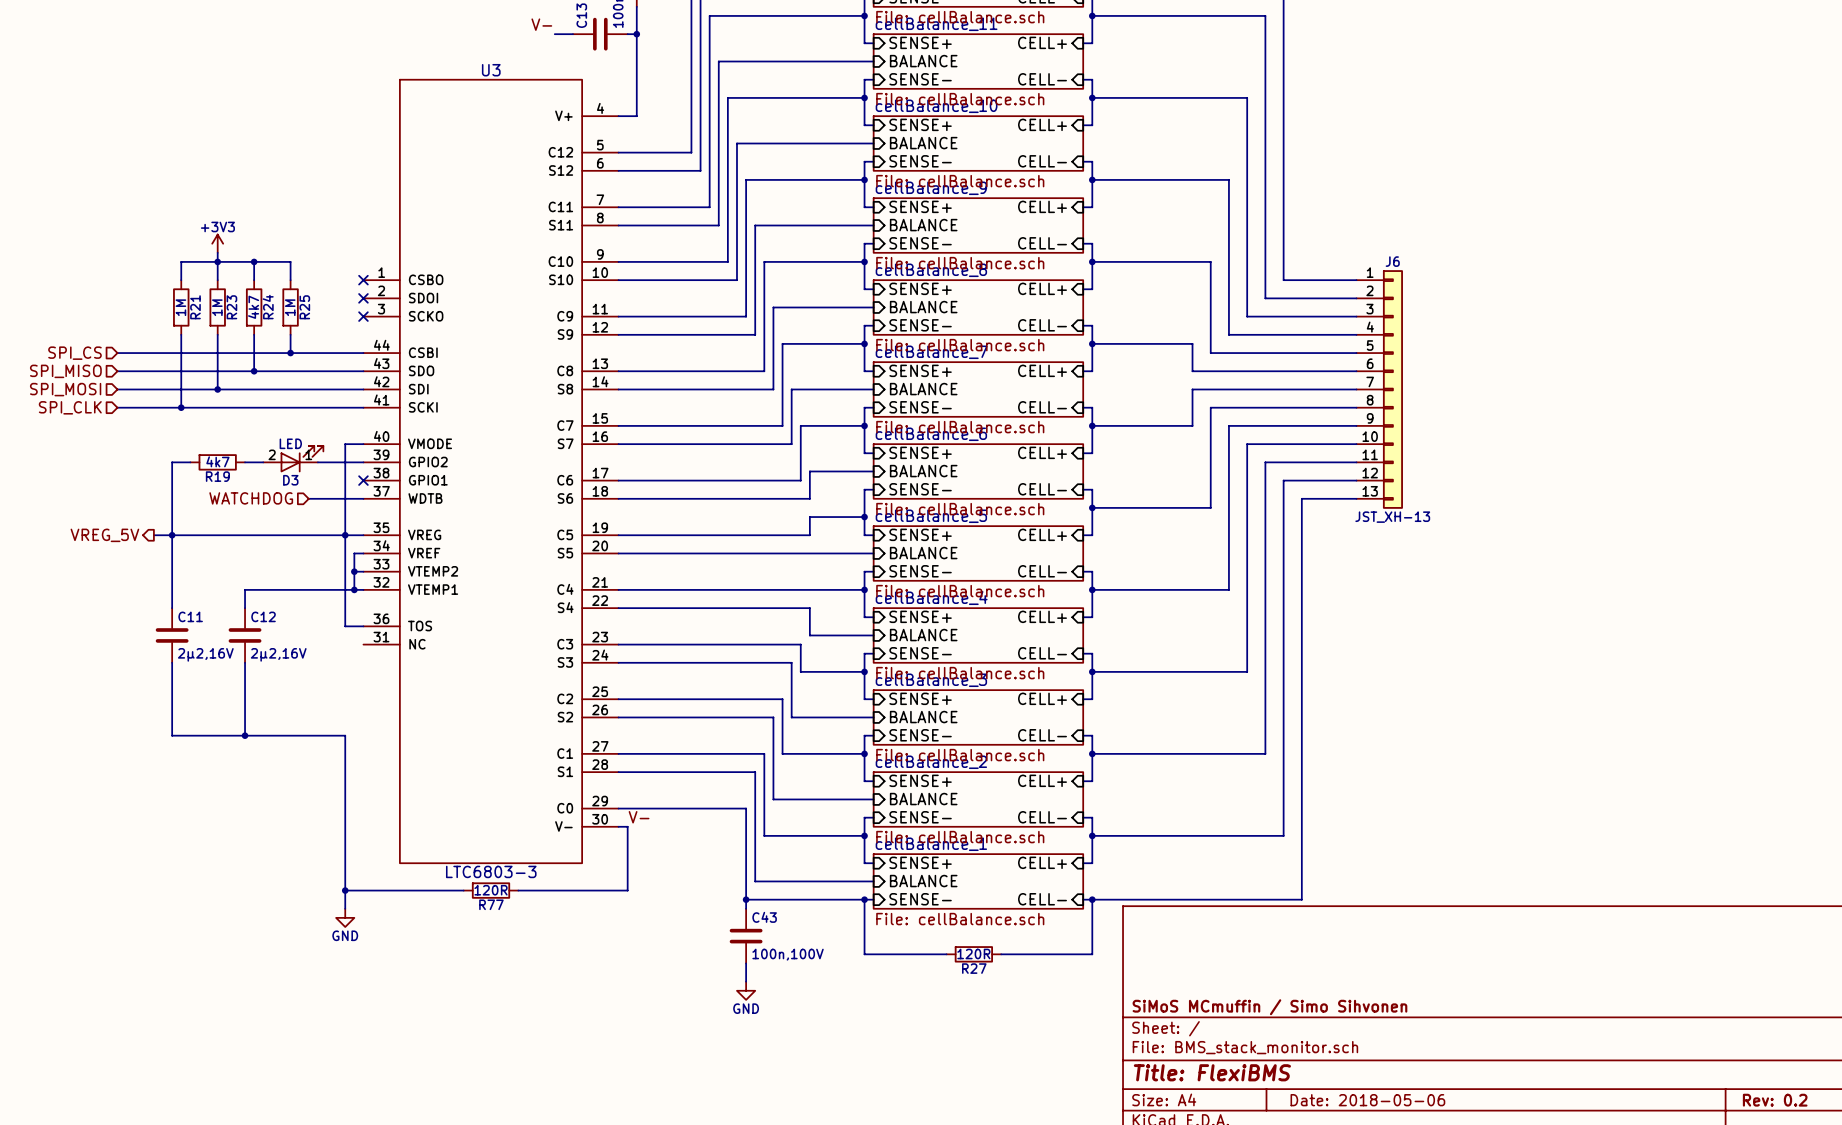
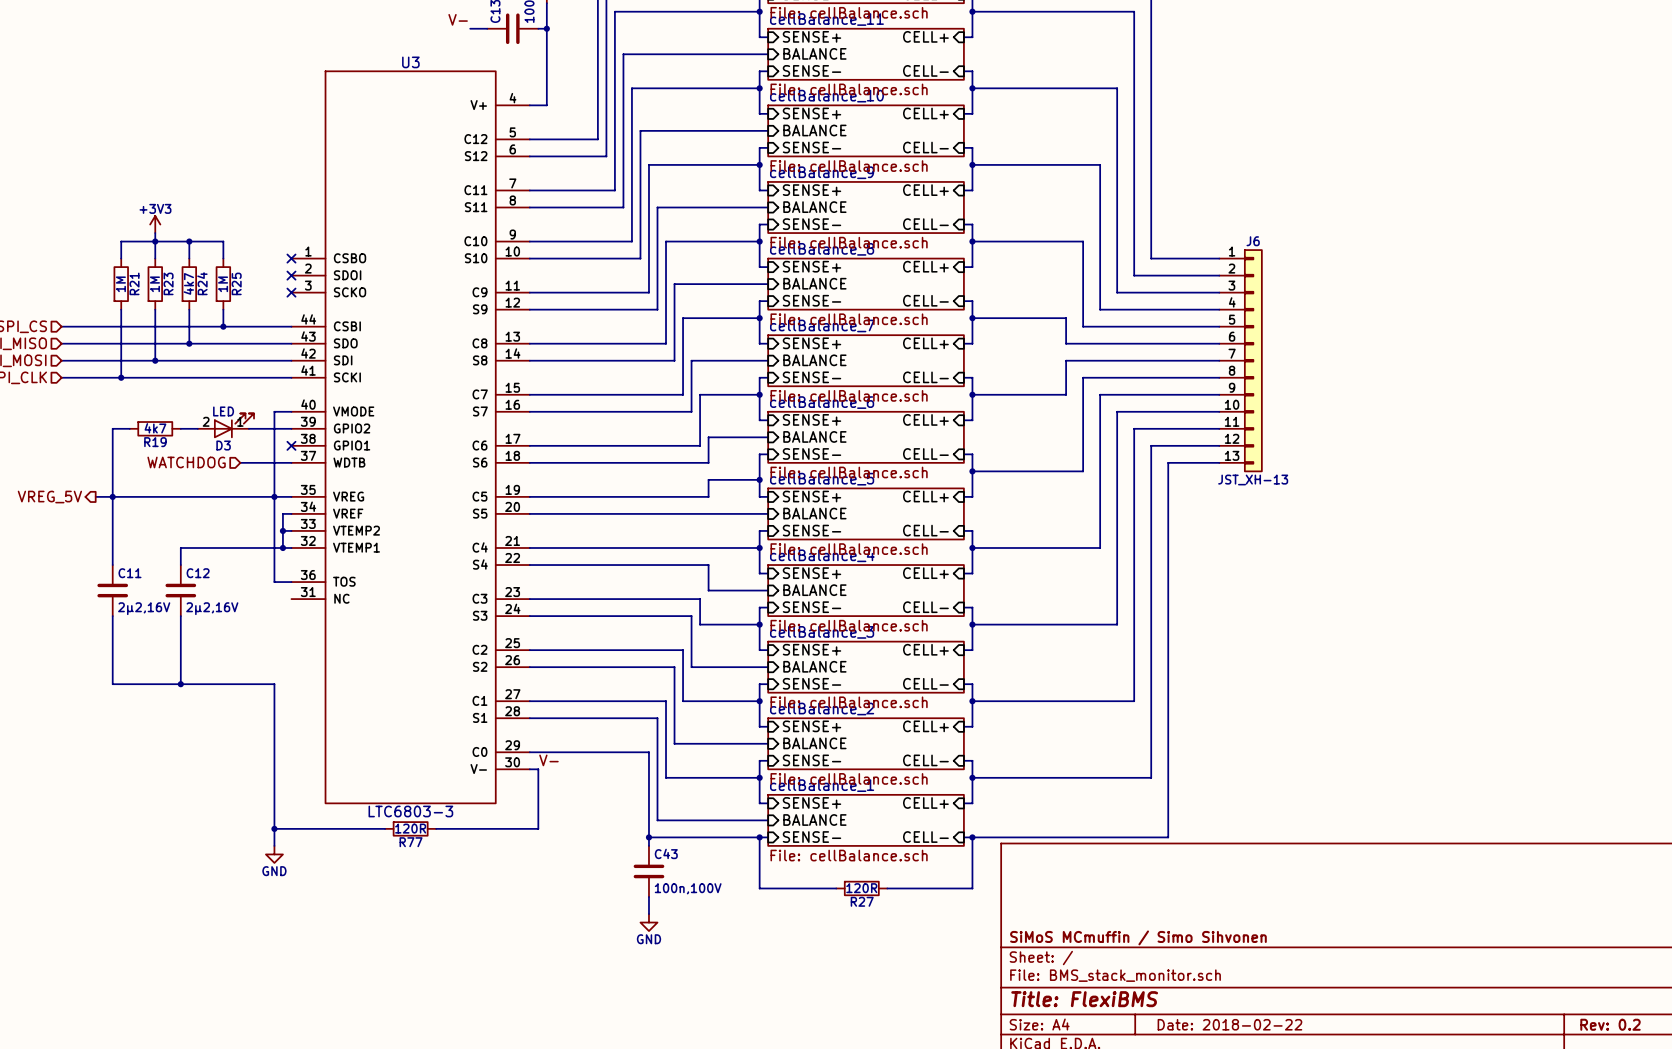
title block: Date: 2018-05-06 (1367, 1100) -> Date: 2018-02-22 (1229, 1024)

